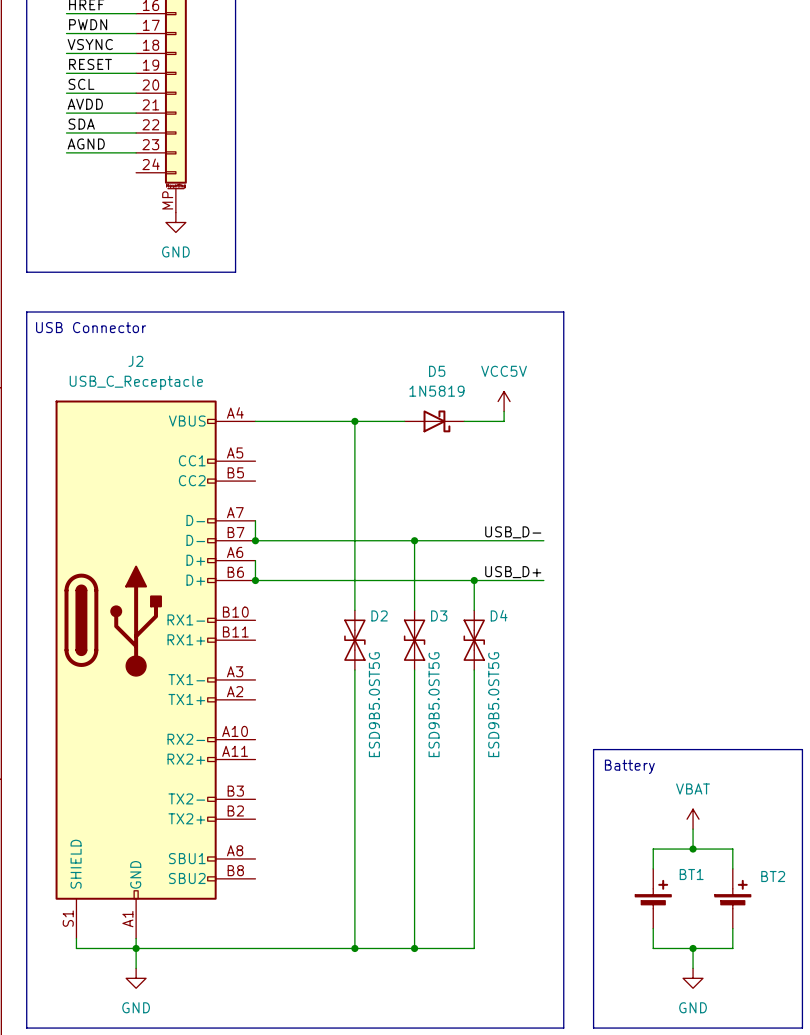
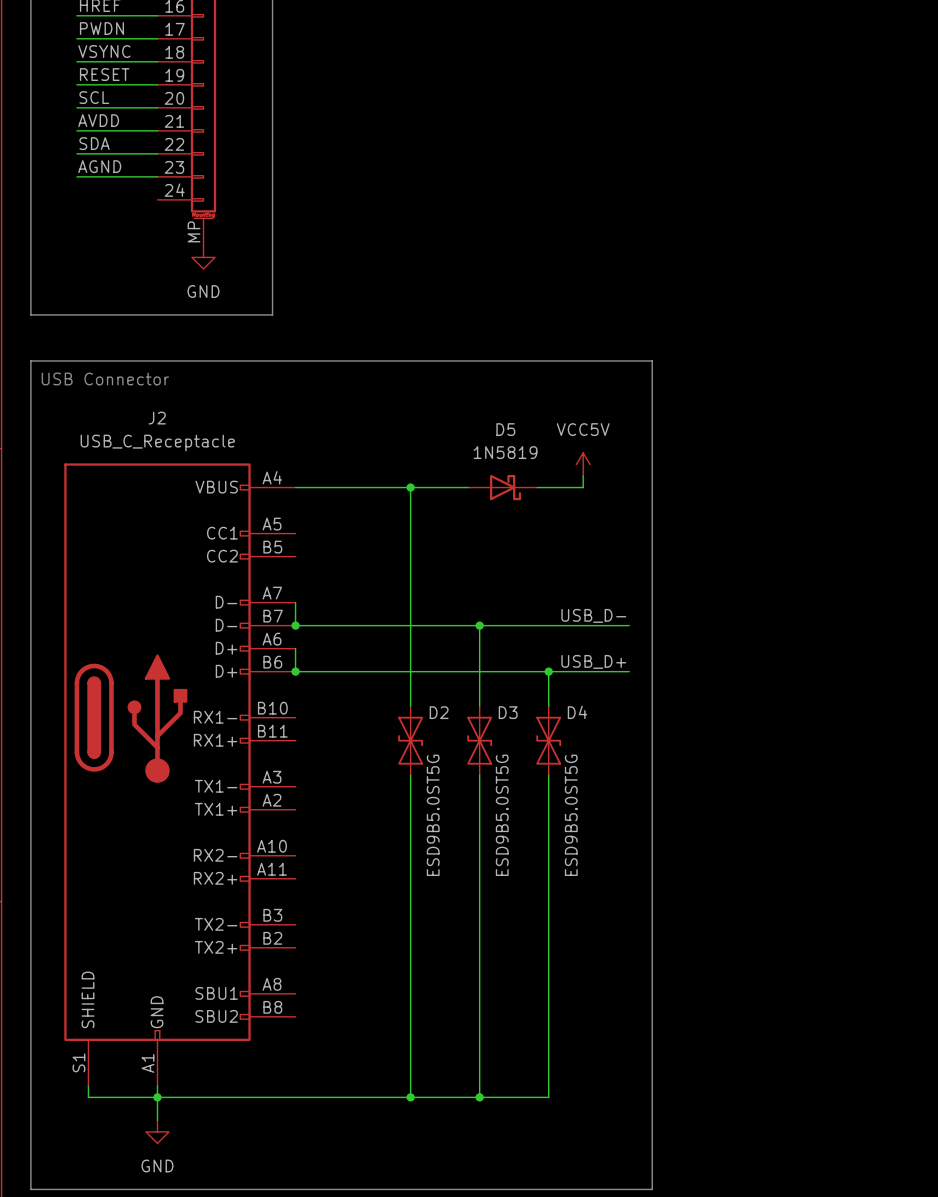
line: (593, 749) (802, 749) (802, 1028) (593, 1028) (593, 749) -> none
text: Battery (629, 766) -> none
power symbol: VBAT (693, 819) -> none
wire: (693, 829) (693, 849) -> none
junction: (693, 849) -> none
wire: (653, 868) (653, 849) (732, 849) (732, 868) -> none
BT1: (653, 898) -> none
BT2: (732, 898) -> none
wire: (653, 928) (653, 948) (732, 948) (732, 928) -> none
wire: (693, 948) (693, 968) -> none
junction: (693, 948) -> none
power symbol: GND (693, 978) -> none

